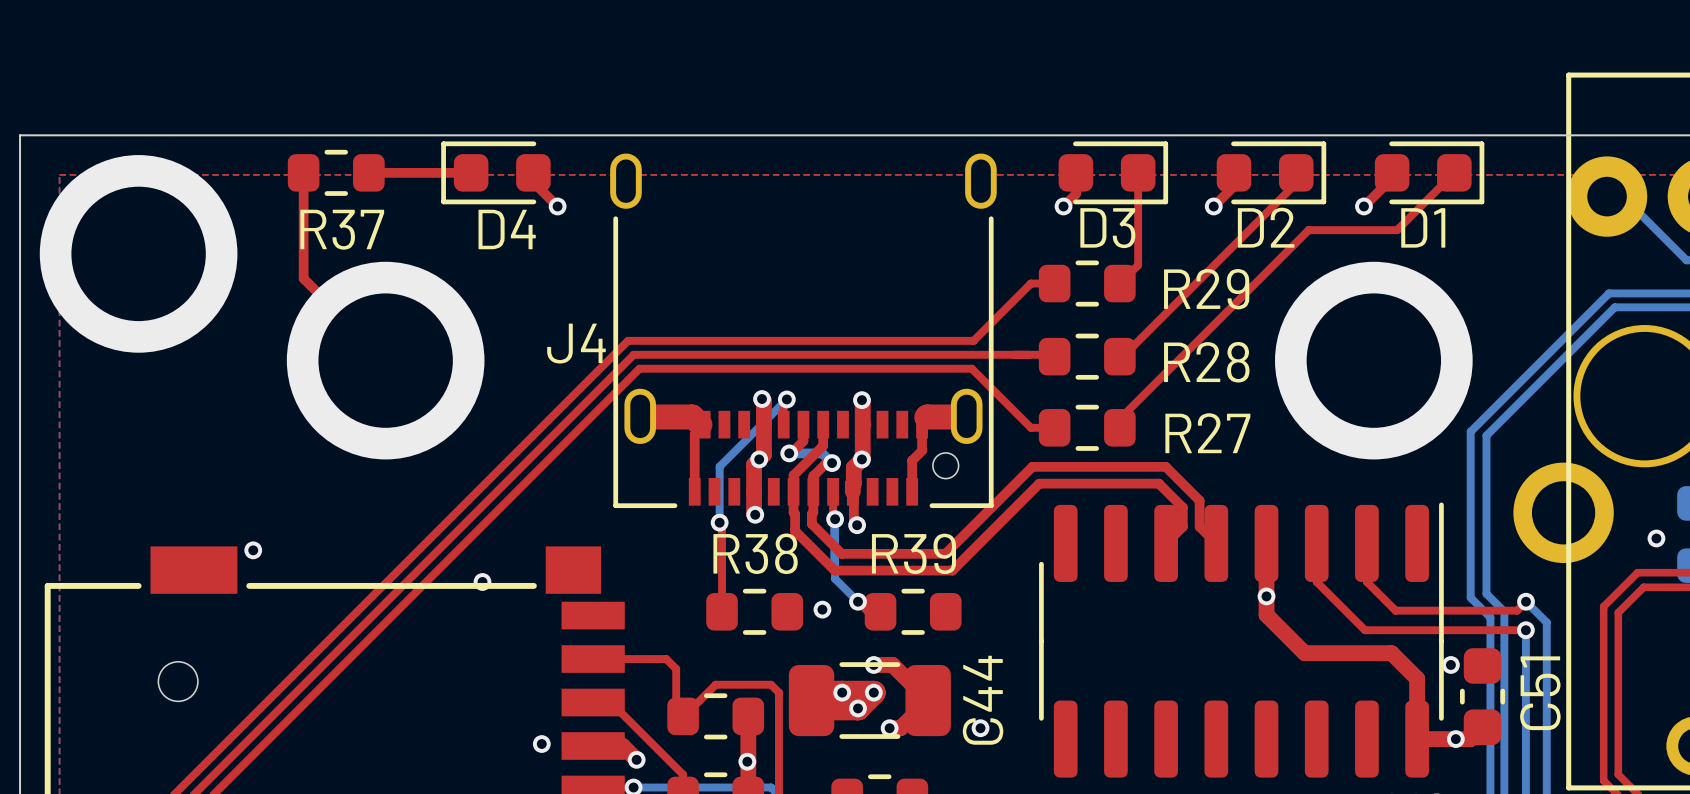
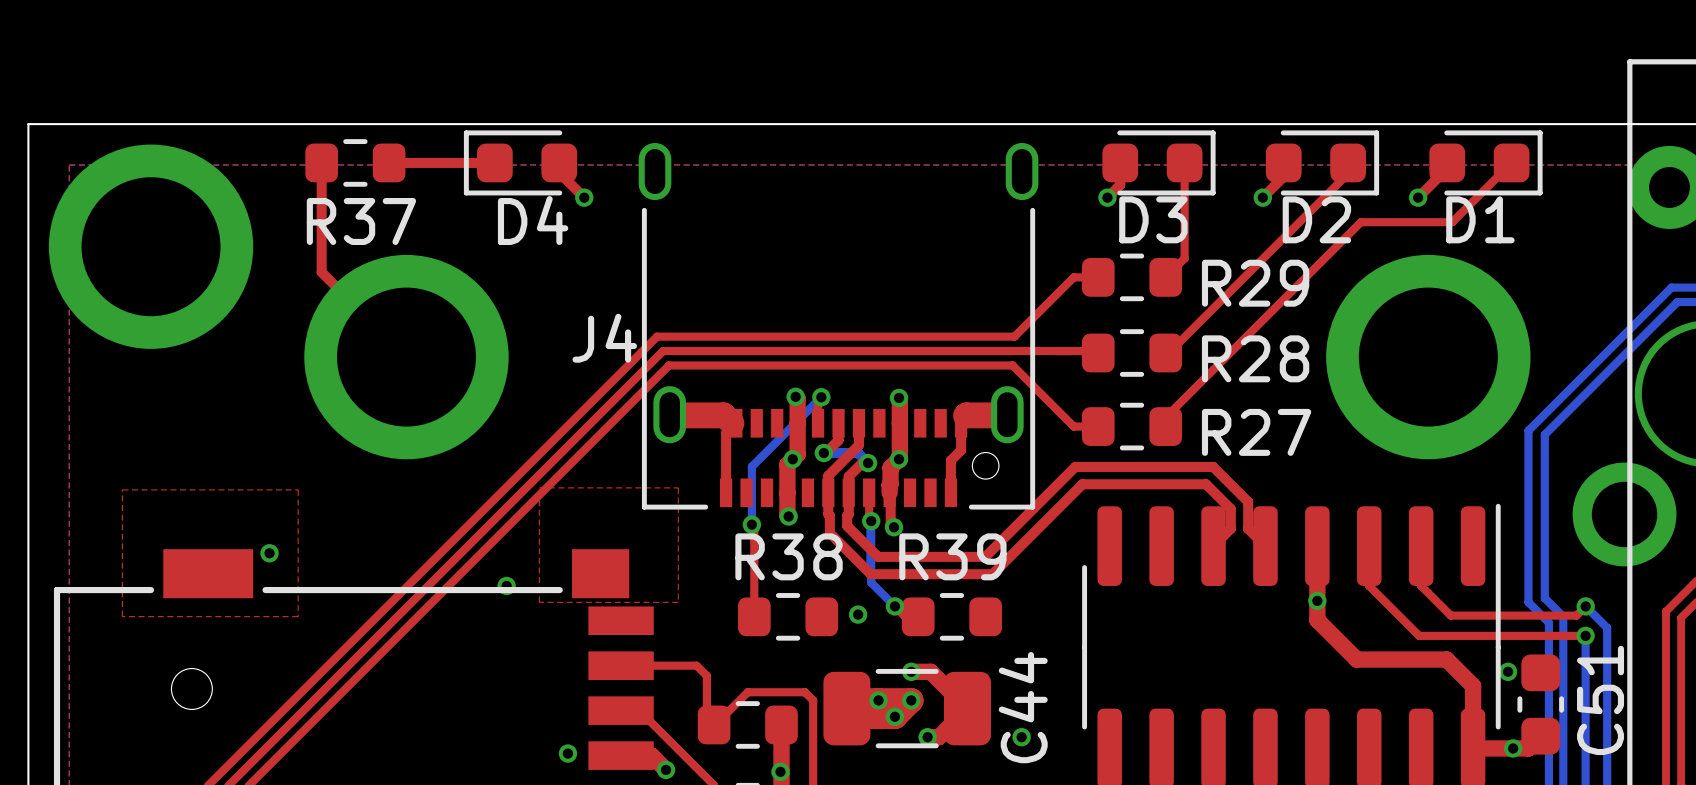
top zone outline: none -> (539, 487) (539, 602) (678, 602) (678, 487) (539, 487)
top zone outline: none -> (122, 489) (122, 616) (298, 616) (298, 489) (122, 489)

